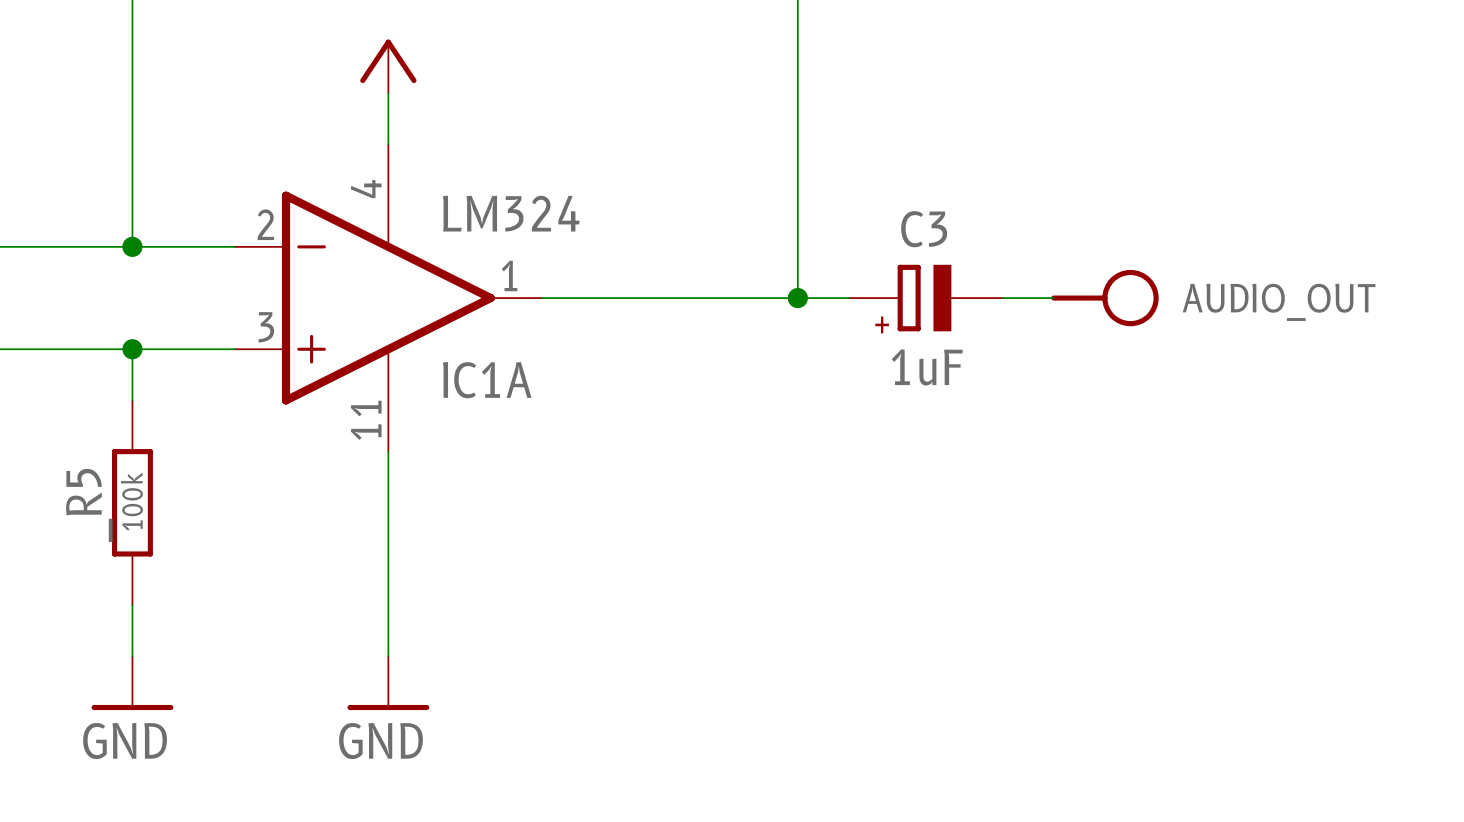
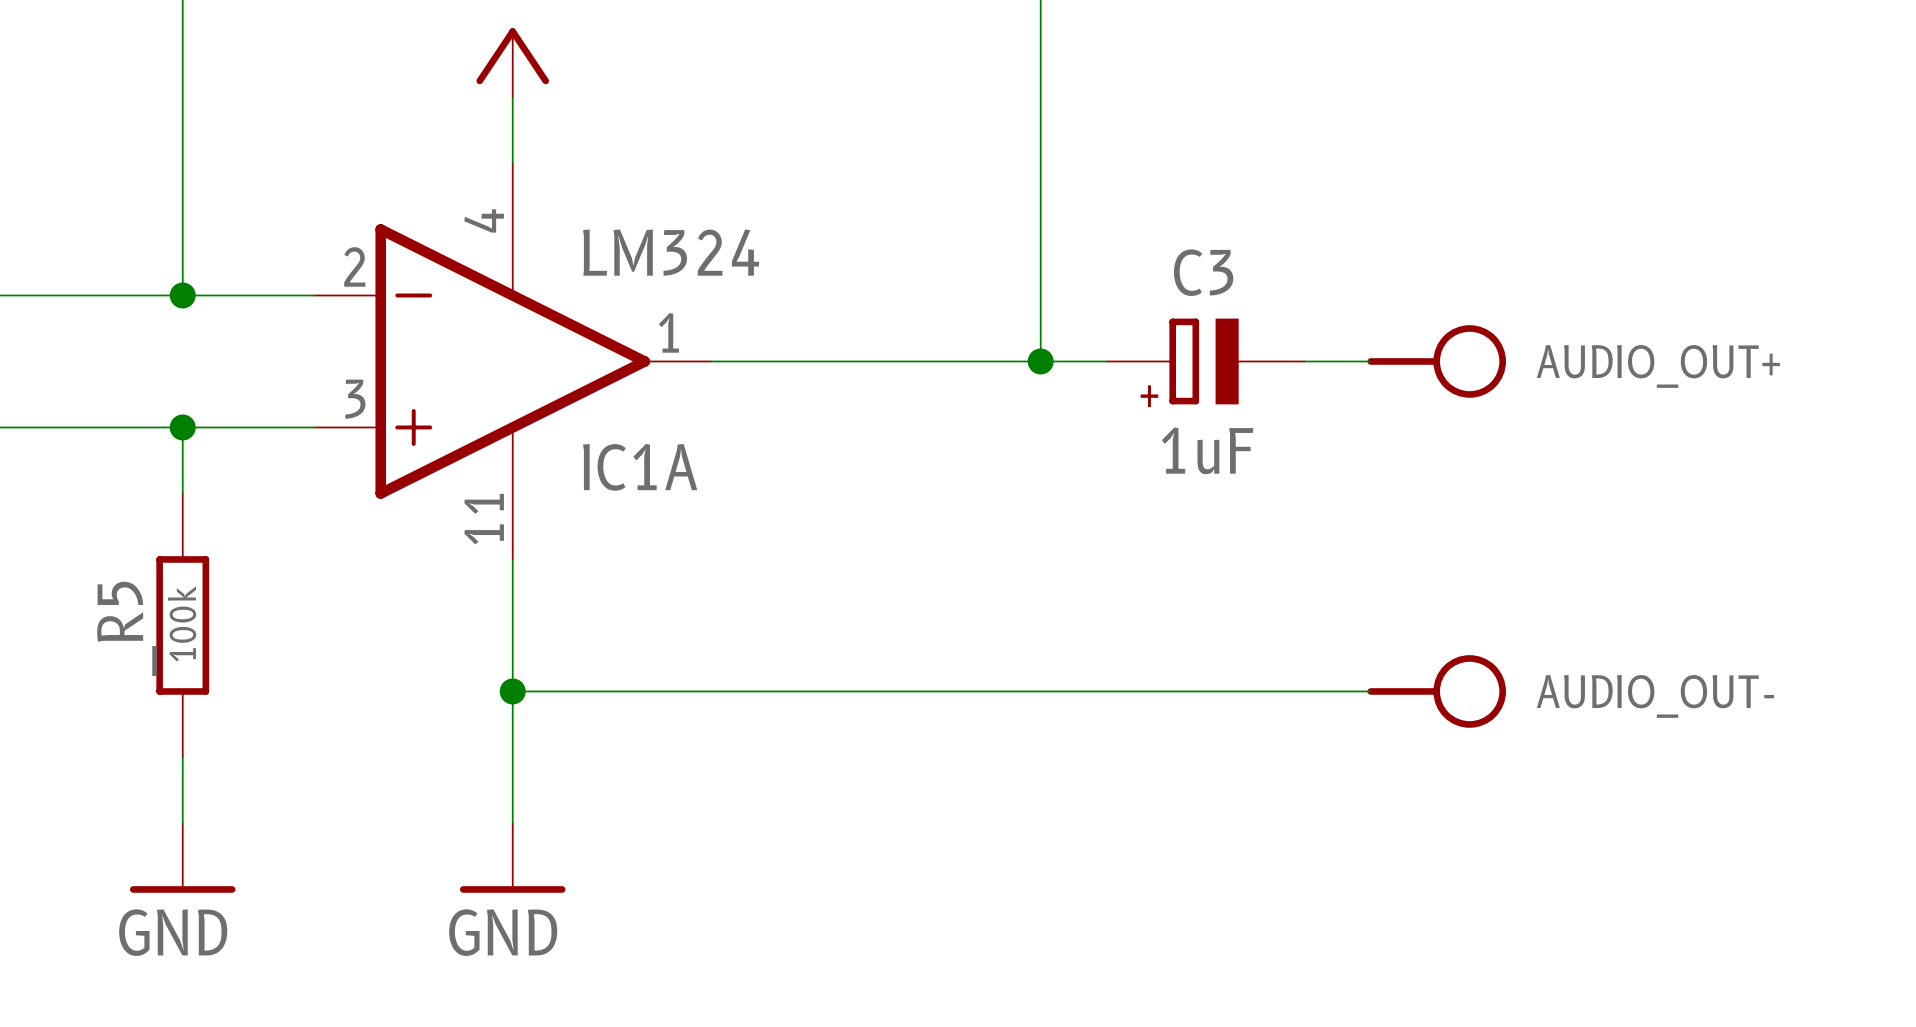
AUDIO_OUT name: AUDIO_OUT (1279, 302) -> AUDIO_OUT+ (1658, 366)
wire: none -> (512, 691) (1370, 691)
junction: none -> (512, 691)
AUDIO_OUT-: none -> (1436, 691)

